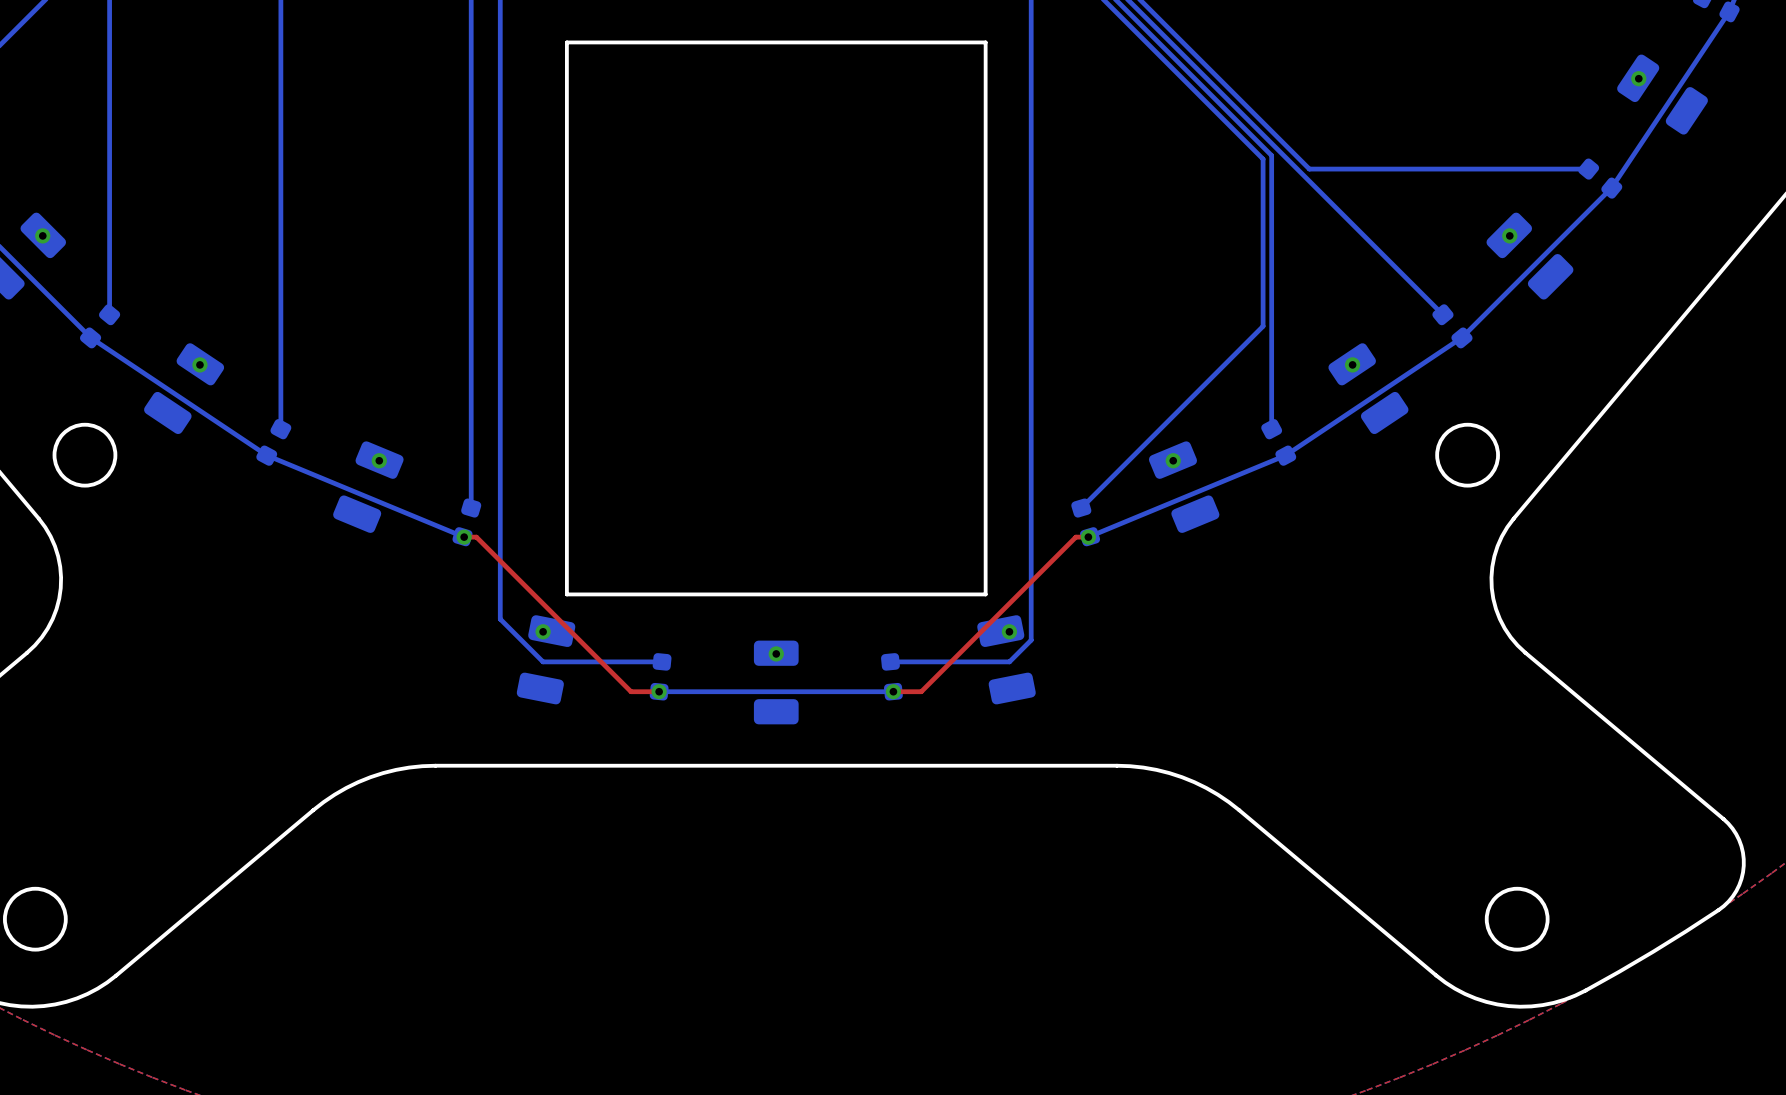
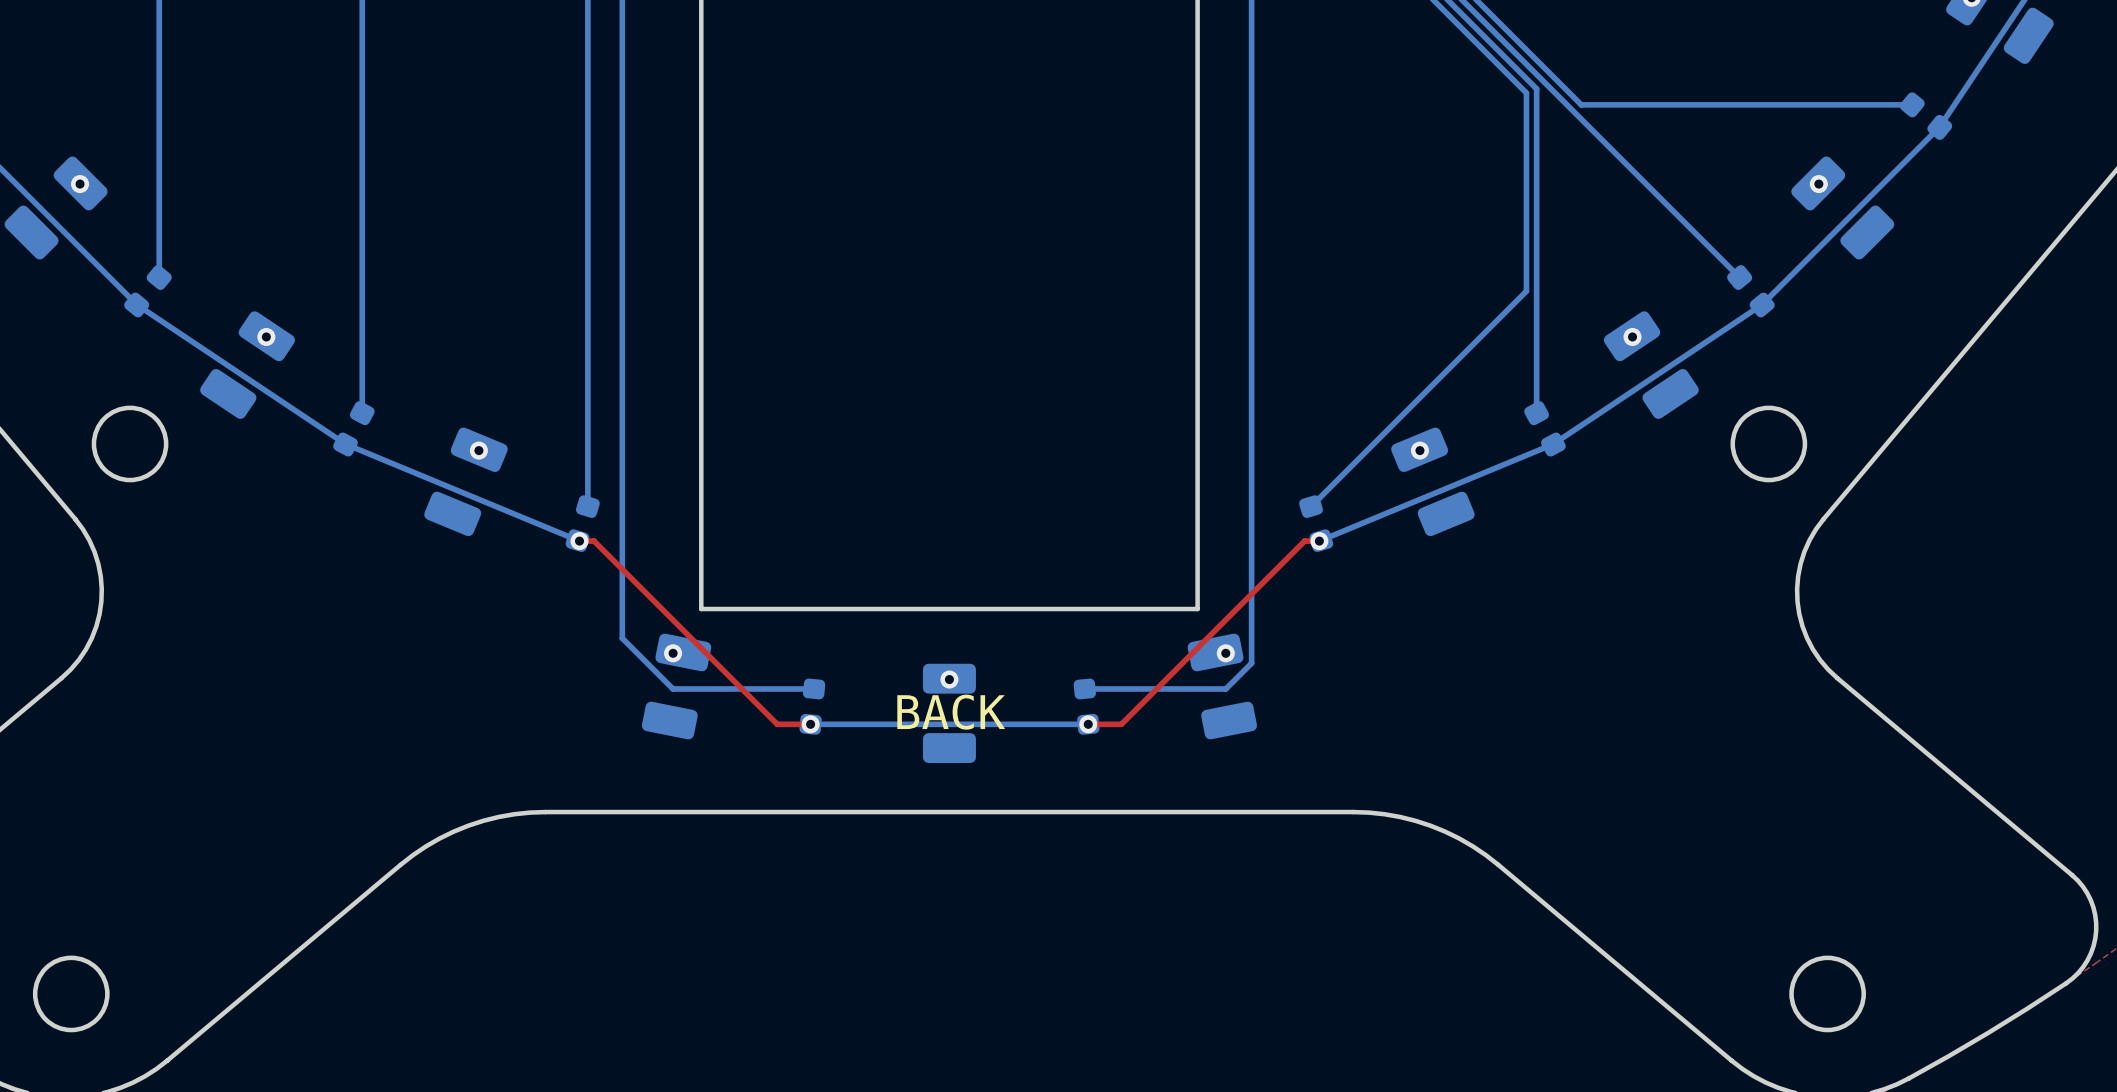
text: none -> BACK (951, 712)

